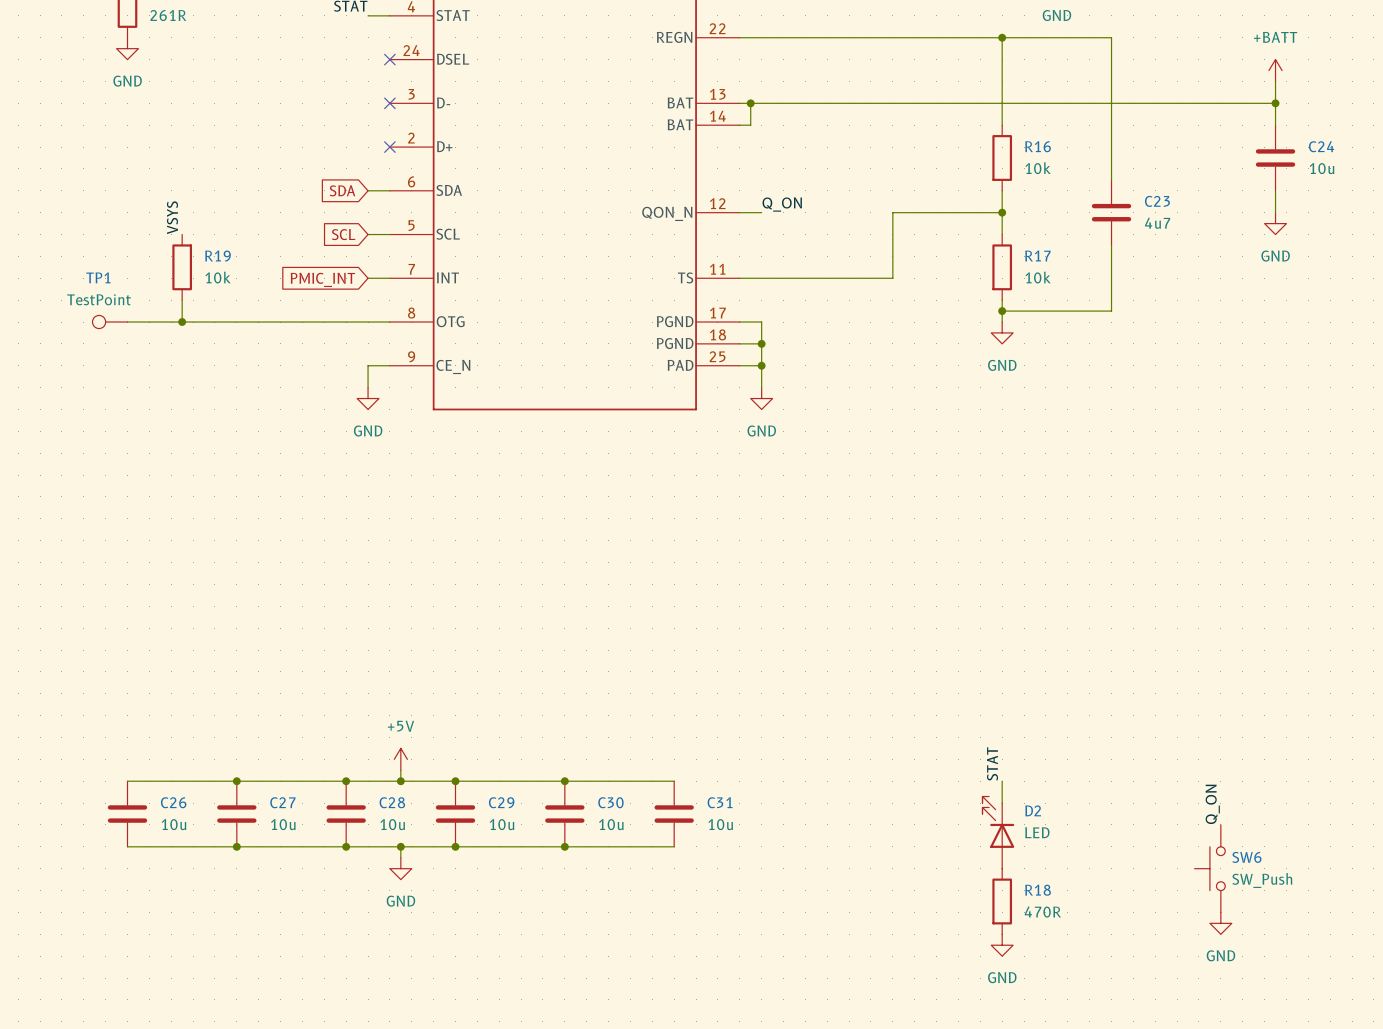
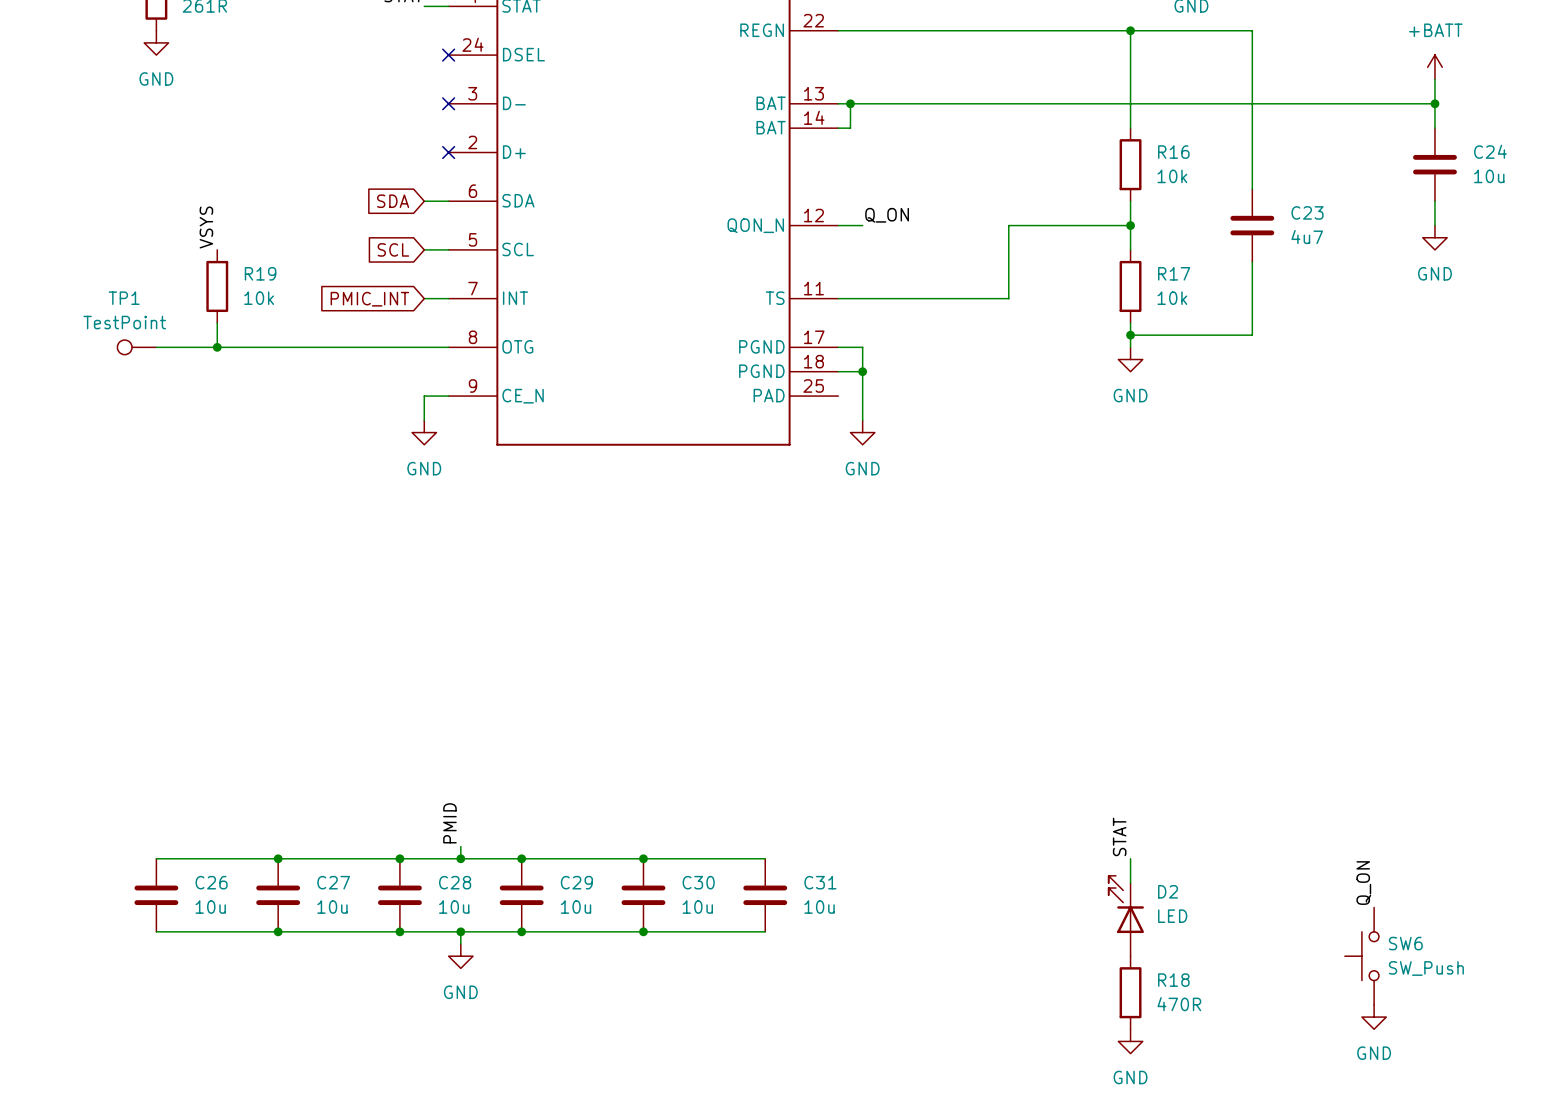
wire: (739, 365) (761, 365) -> none
junction: (761, 365) -> none
label: none -> PMID (449, 823)
power symbol: +5V (400, 759) -> none

